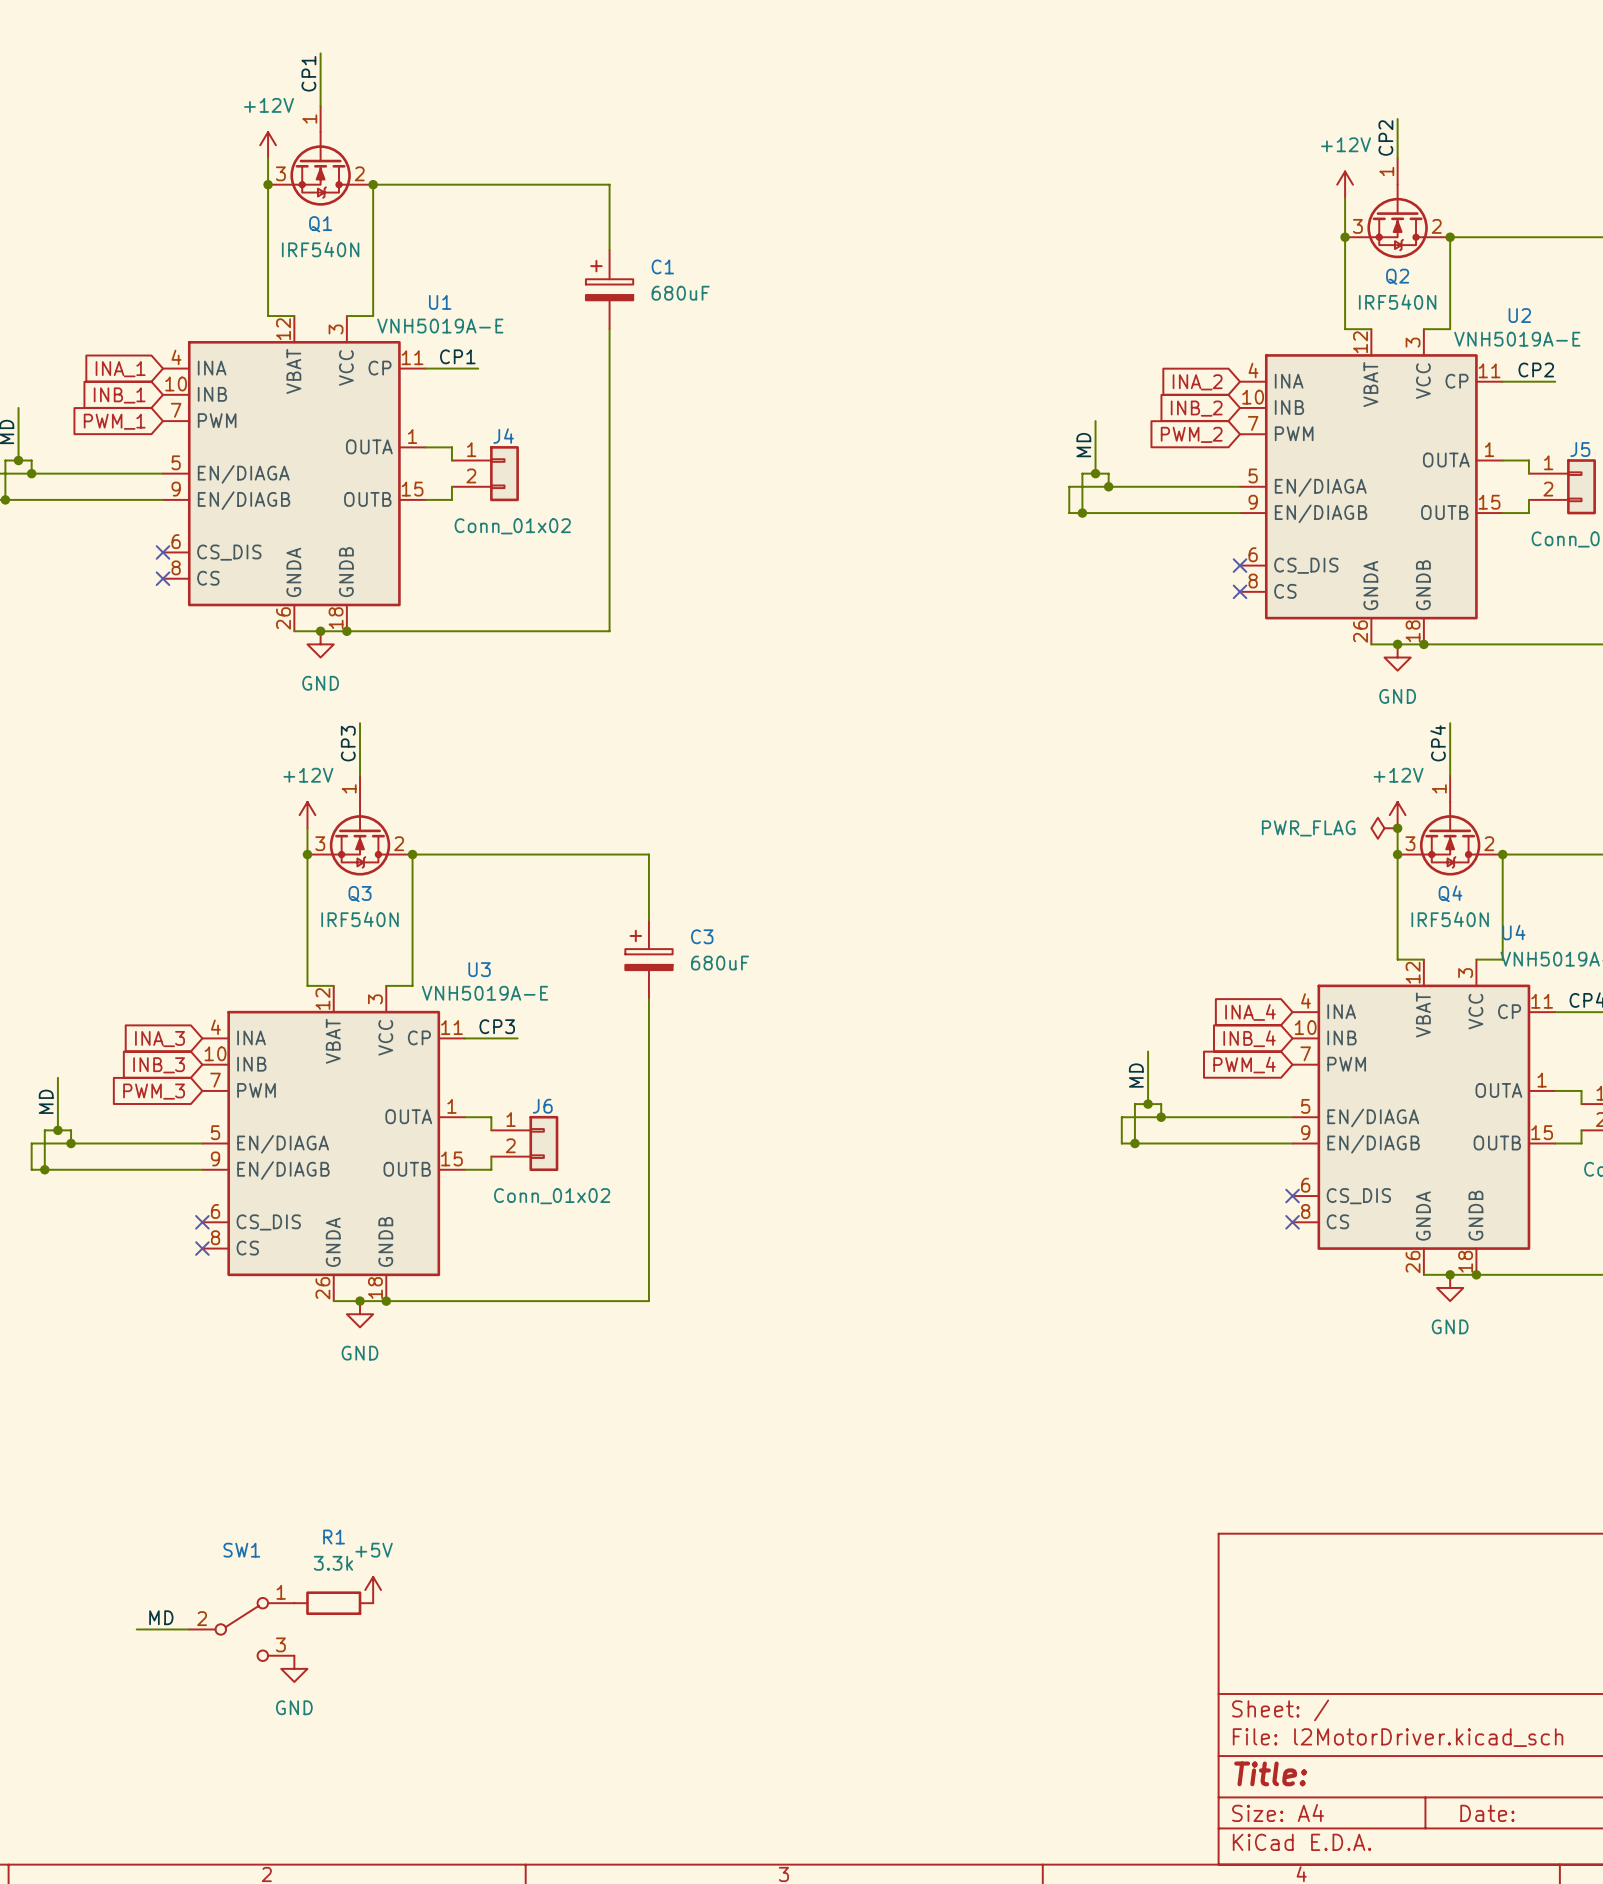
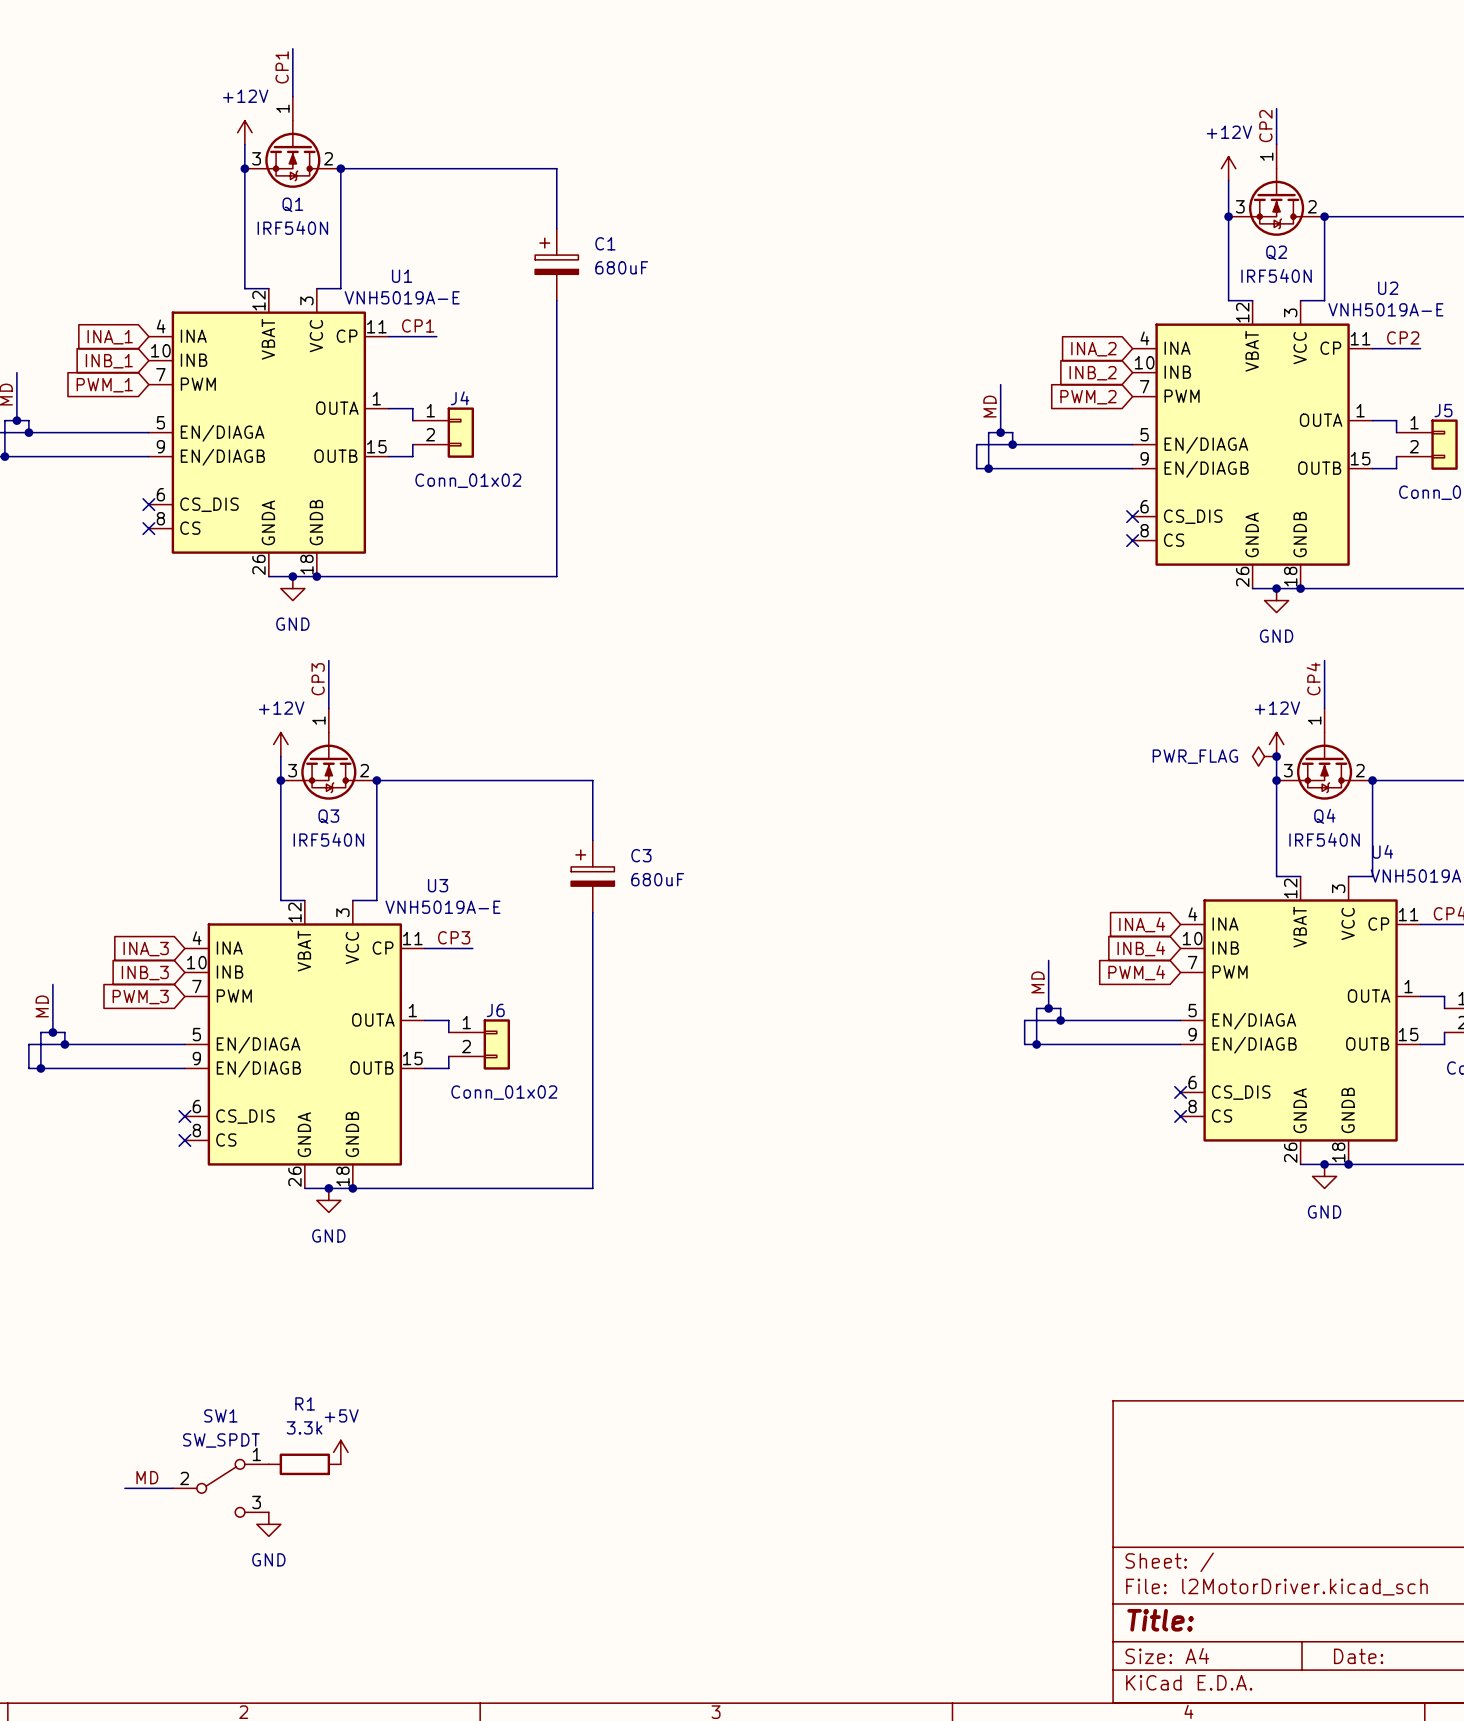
SW1 value: none -> SW_SPDT (221, 1440)

